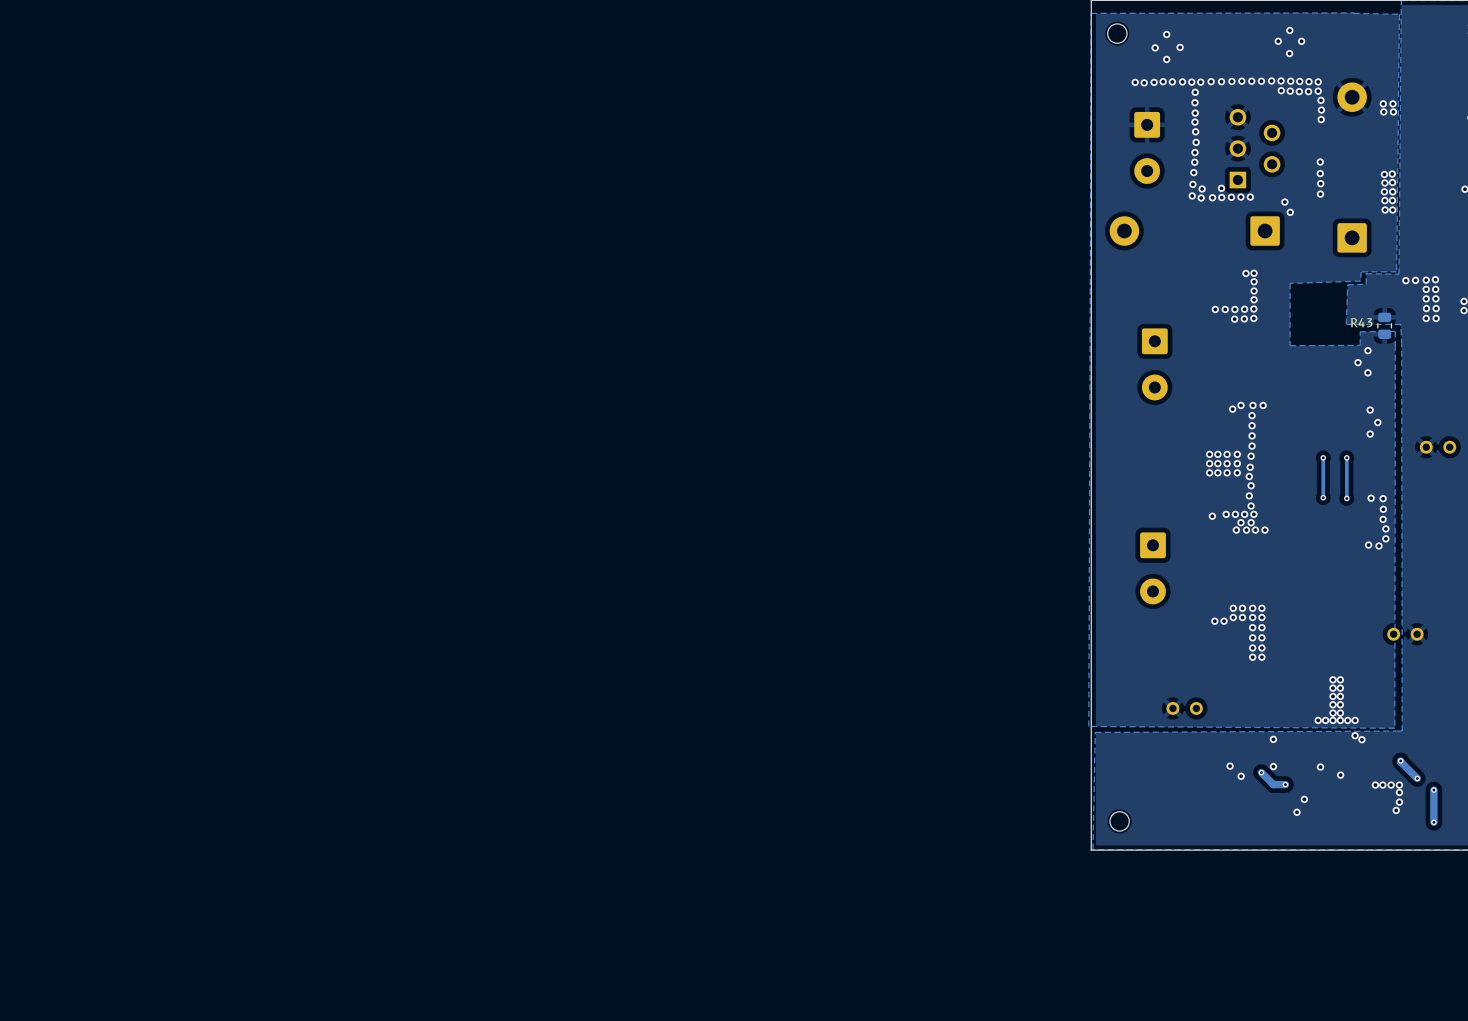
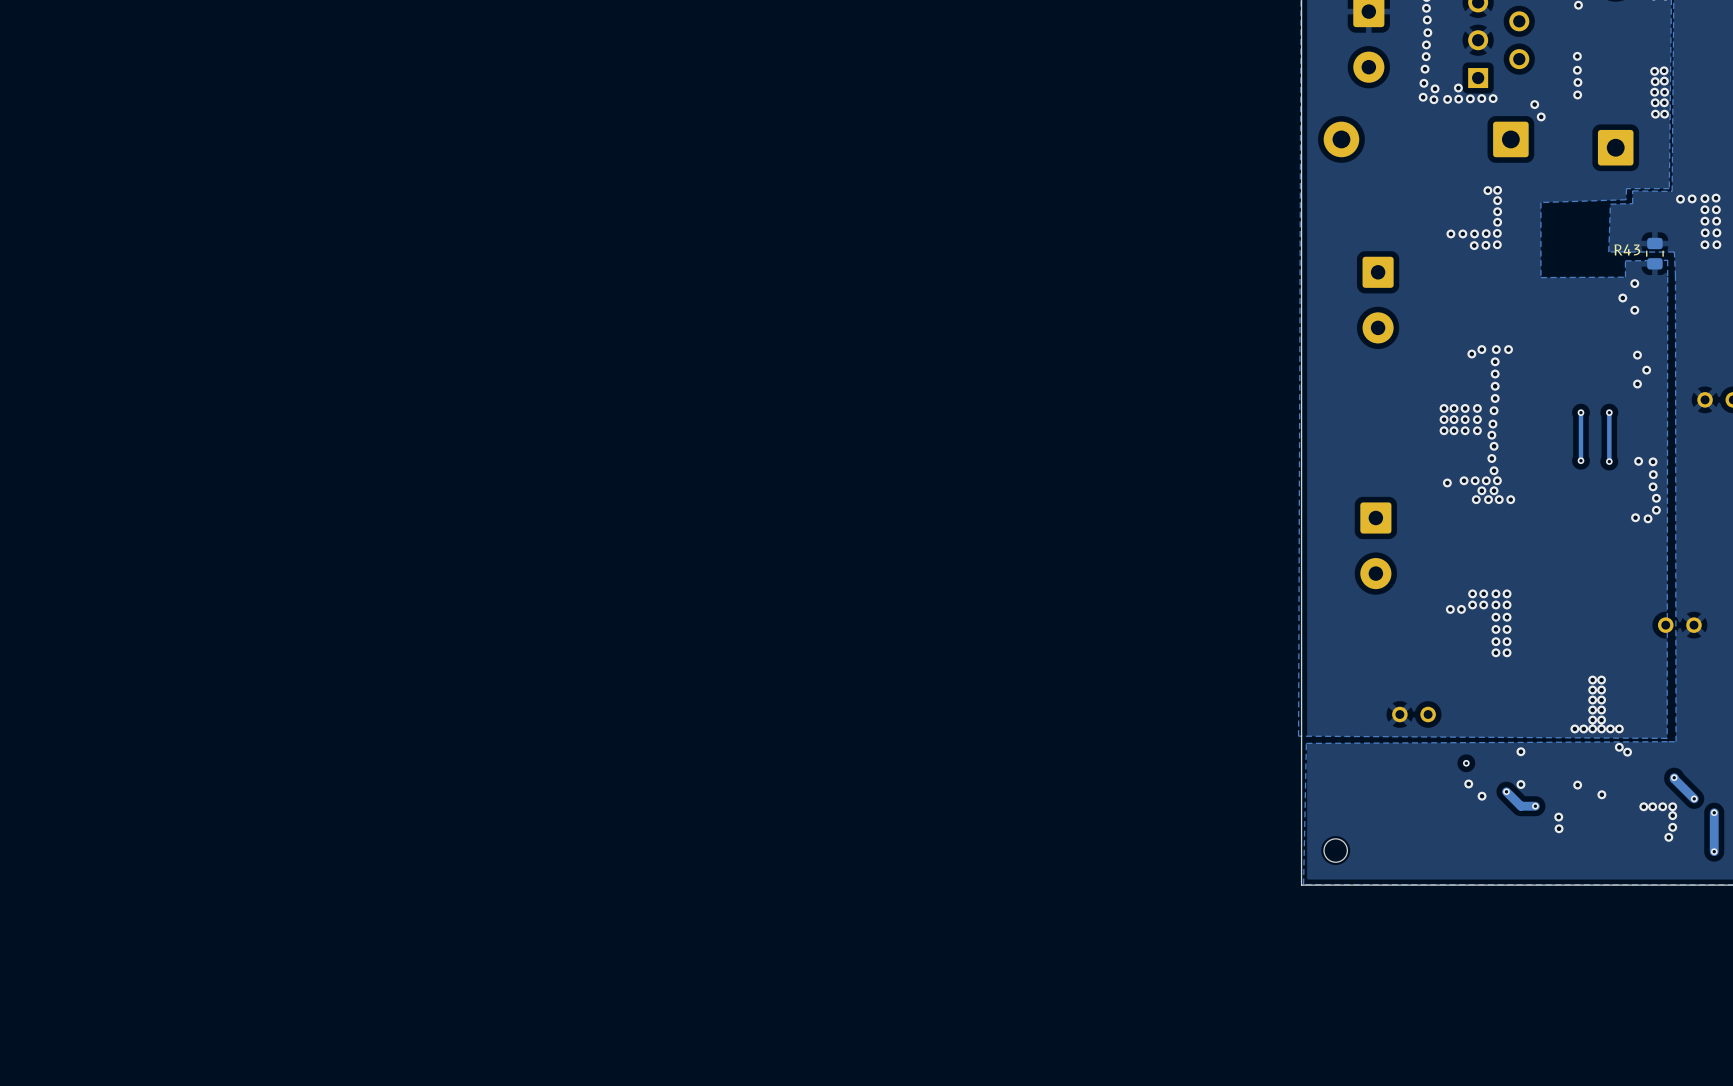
via: none -> (1466, 763)
via: none -> (1558, 817)
via: (1304, 799) -> none
via: none -> (1559, 828)
via: (1296, 812) -> none

